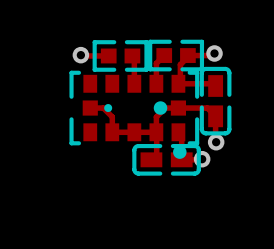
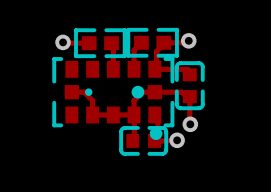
part footprint: [199, 66, 232, 136] -> [174, 61, 205, 111]
part footprint: [132, 143, 201, 176] -> [119, 126, 169, 156]

